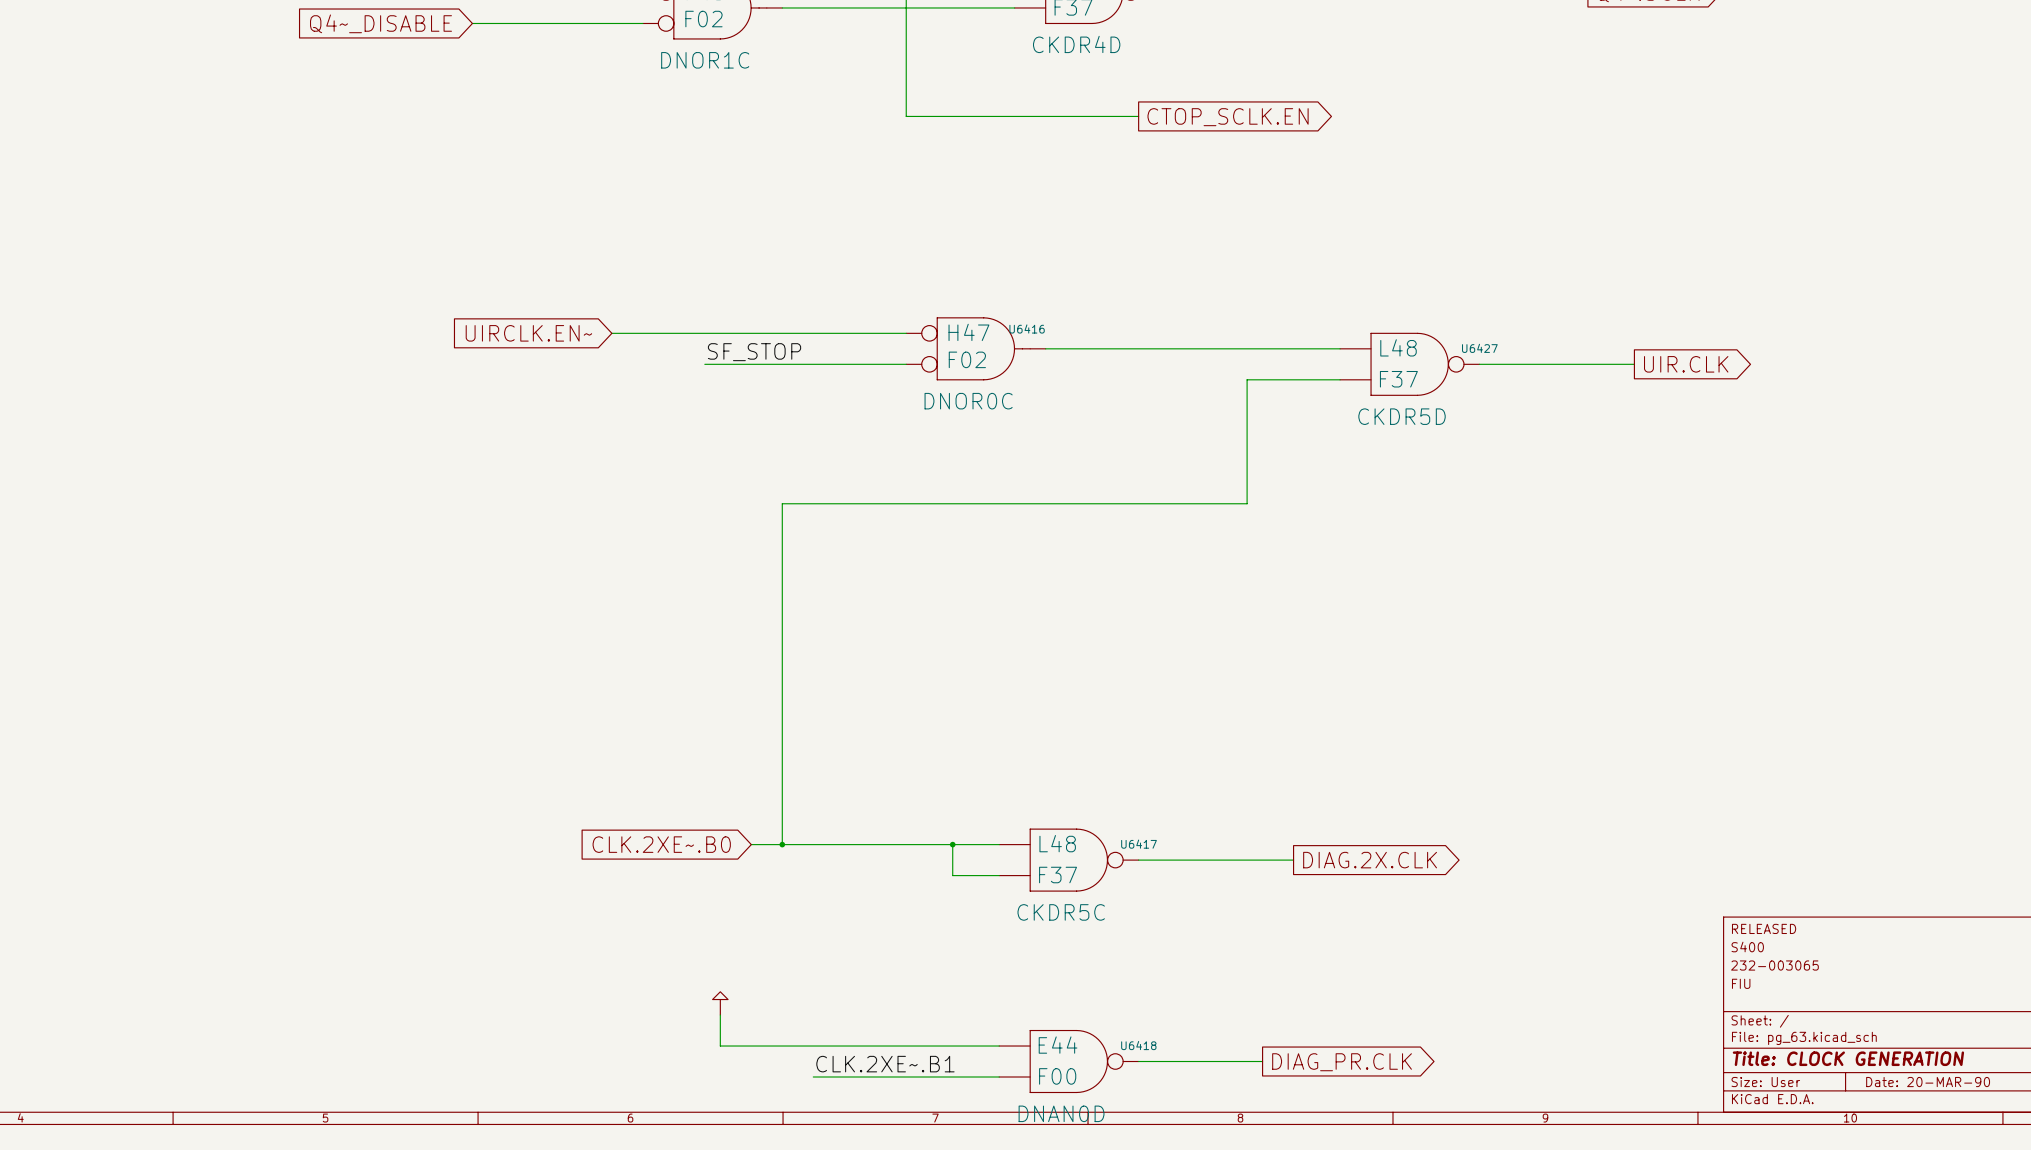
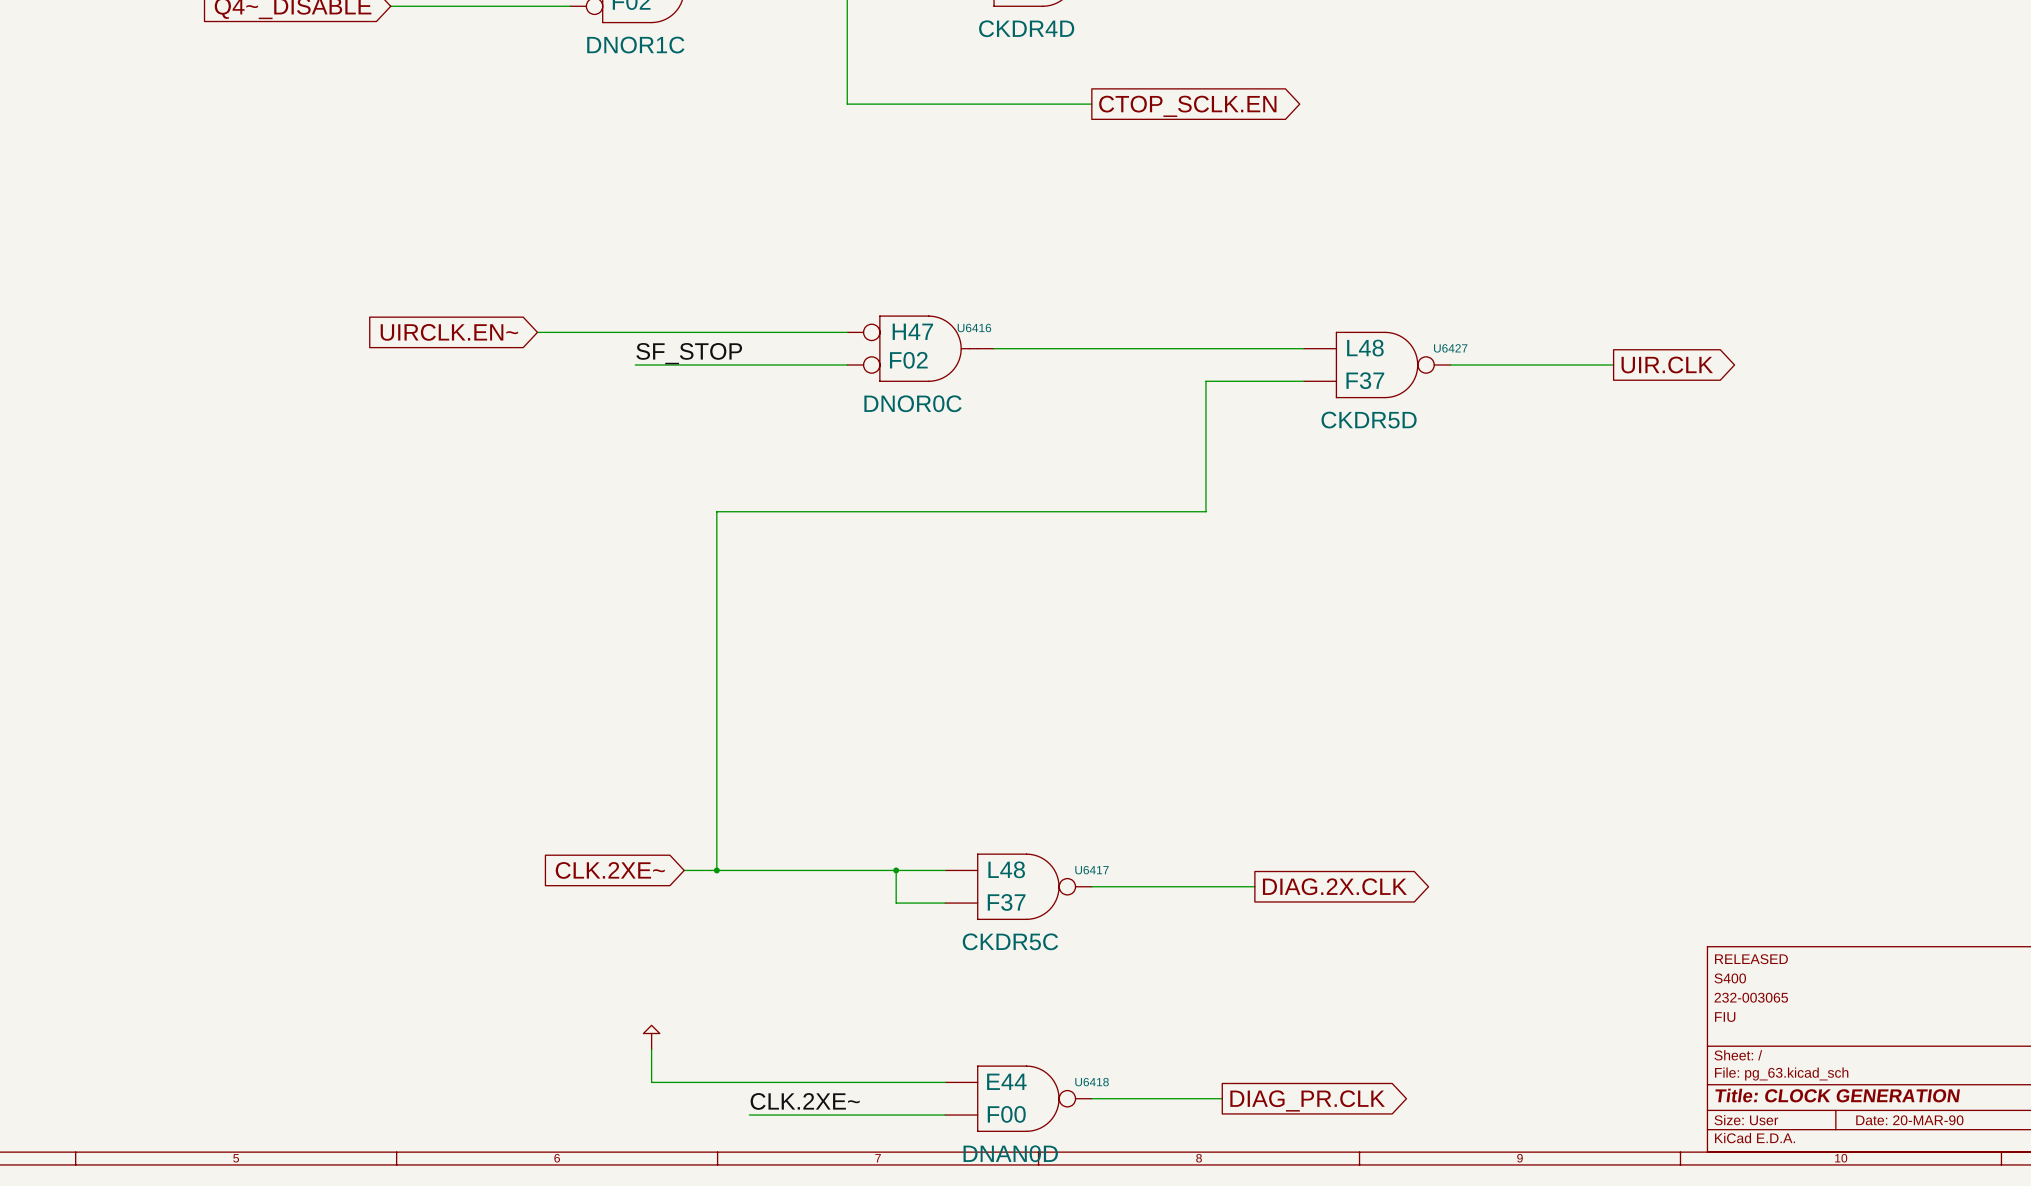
global label: CLK.2XE~.B0 (661, 844) -> CLK.2XE~ (610, 870)
label: CLK.2XE~.B1 (885, 1064) -> CLK.2XE~ (805, 1101)

